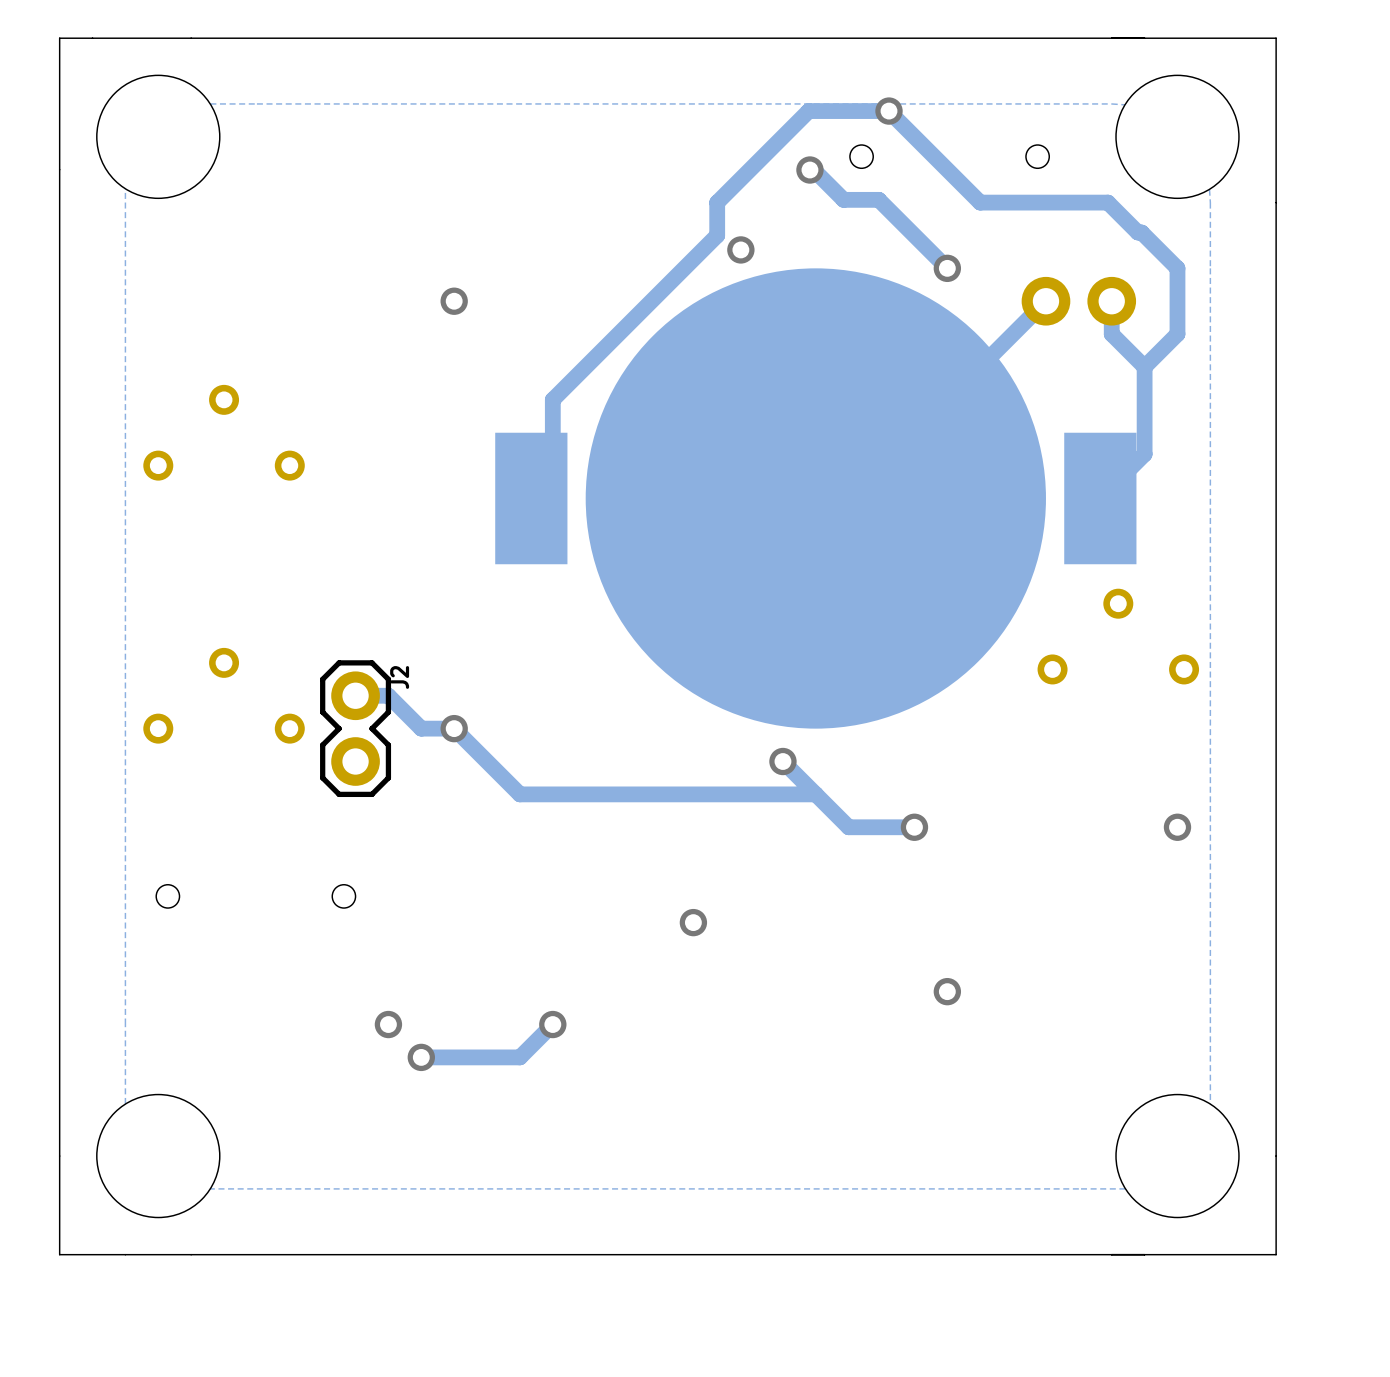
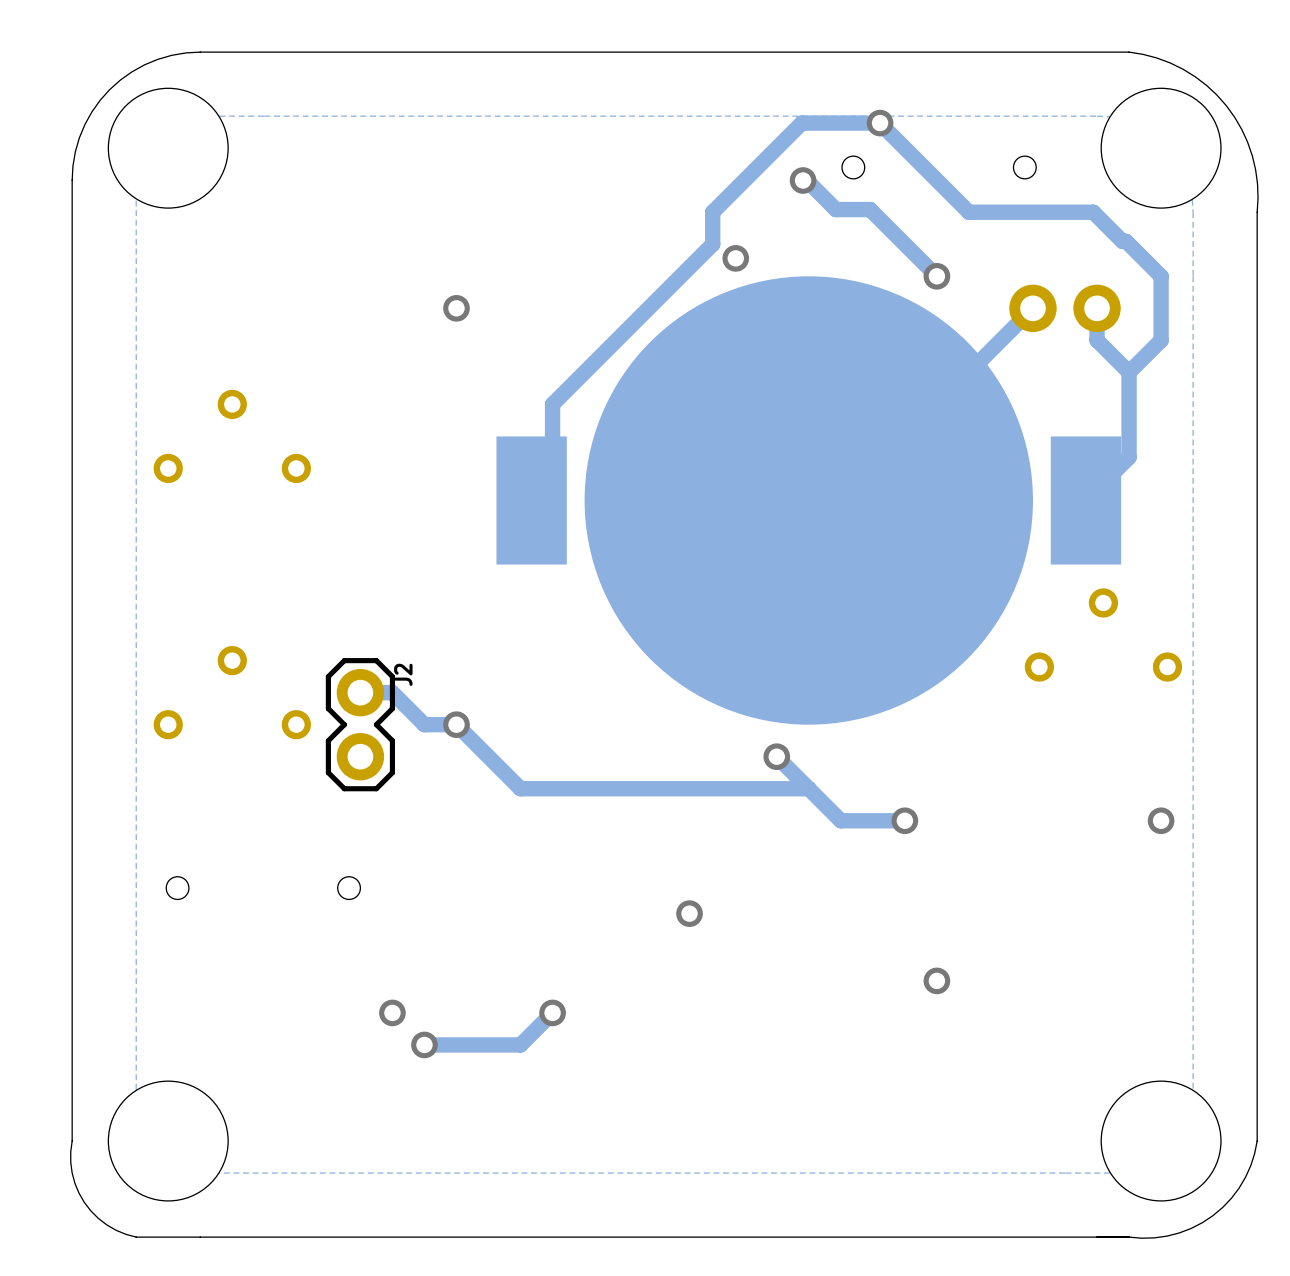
board edge: (191, 38) (59, 38) (59, 169) -> (200, 52) (171, 55) (144, 64) (132, 71) (109, 89) (91, 112) (84, 124) (75, 151) (72, 180)
board edge: (1144, 38) (1276, 38) (1276, 202) -> (1129, 52) (1156, 58) (1183, 69) (1206, 85) (1226, 105) (1241, 129) (1252, 155) (1257, 183) (1257, 212)
board edge: (59, 1156) (59, 1254) (125, 1254) -> (72, 1141) (72, 1172) (84, 1202) (106, 1224) (136, 1237)
board edge: (1276, 1156) (1276, 1254) (1144, 1254) -> (1257, 1141) (1245, 1177) (1231, 1198) (1213, 1215) (1191, 1228) (1166, 1236) (1129, 1237)

